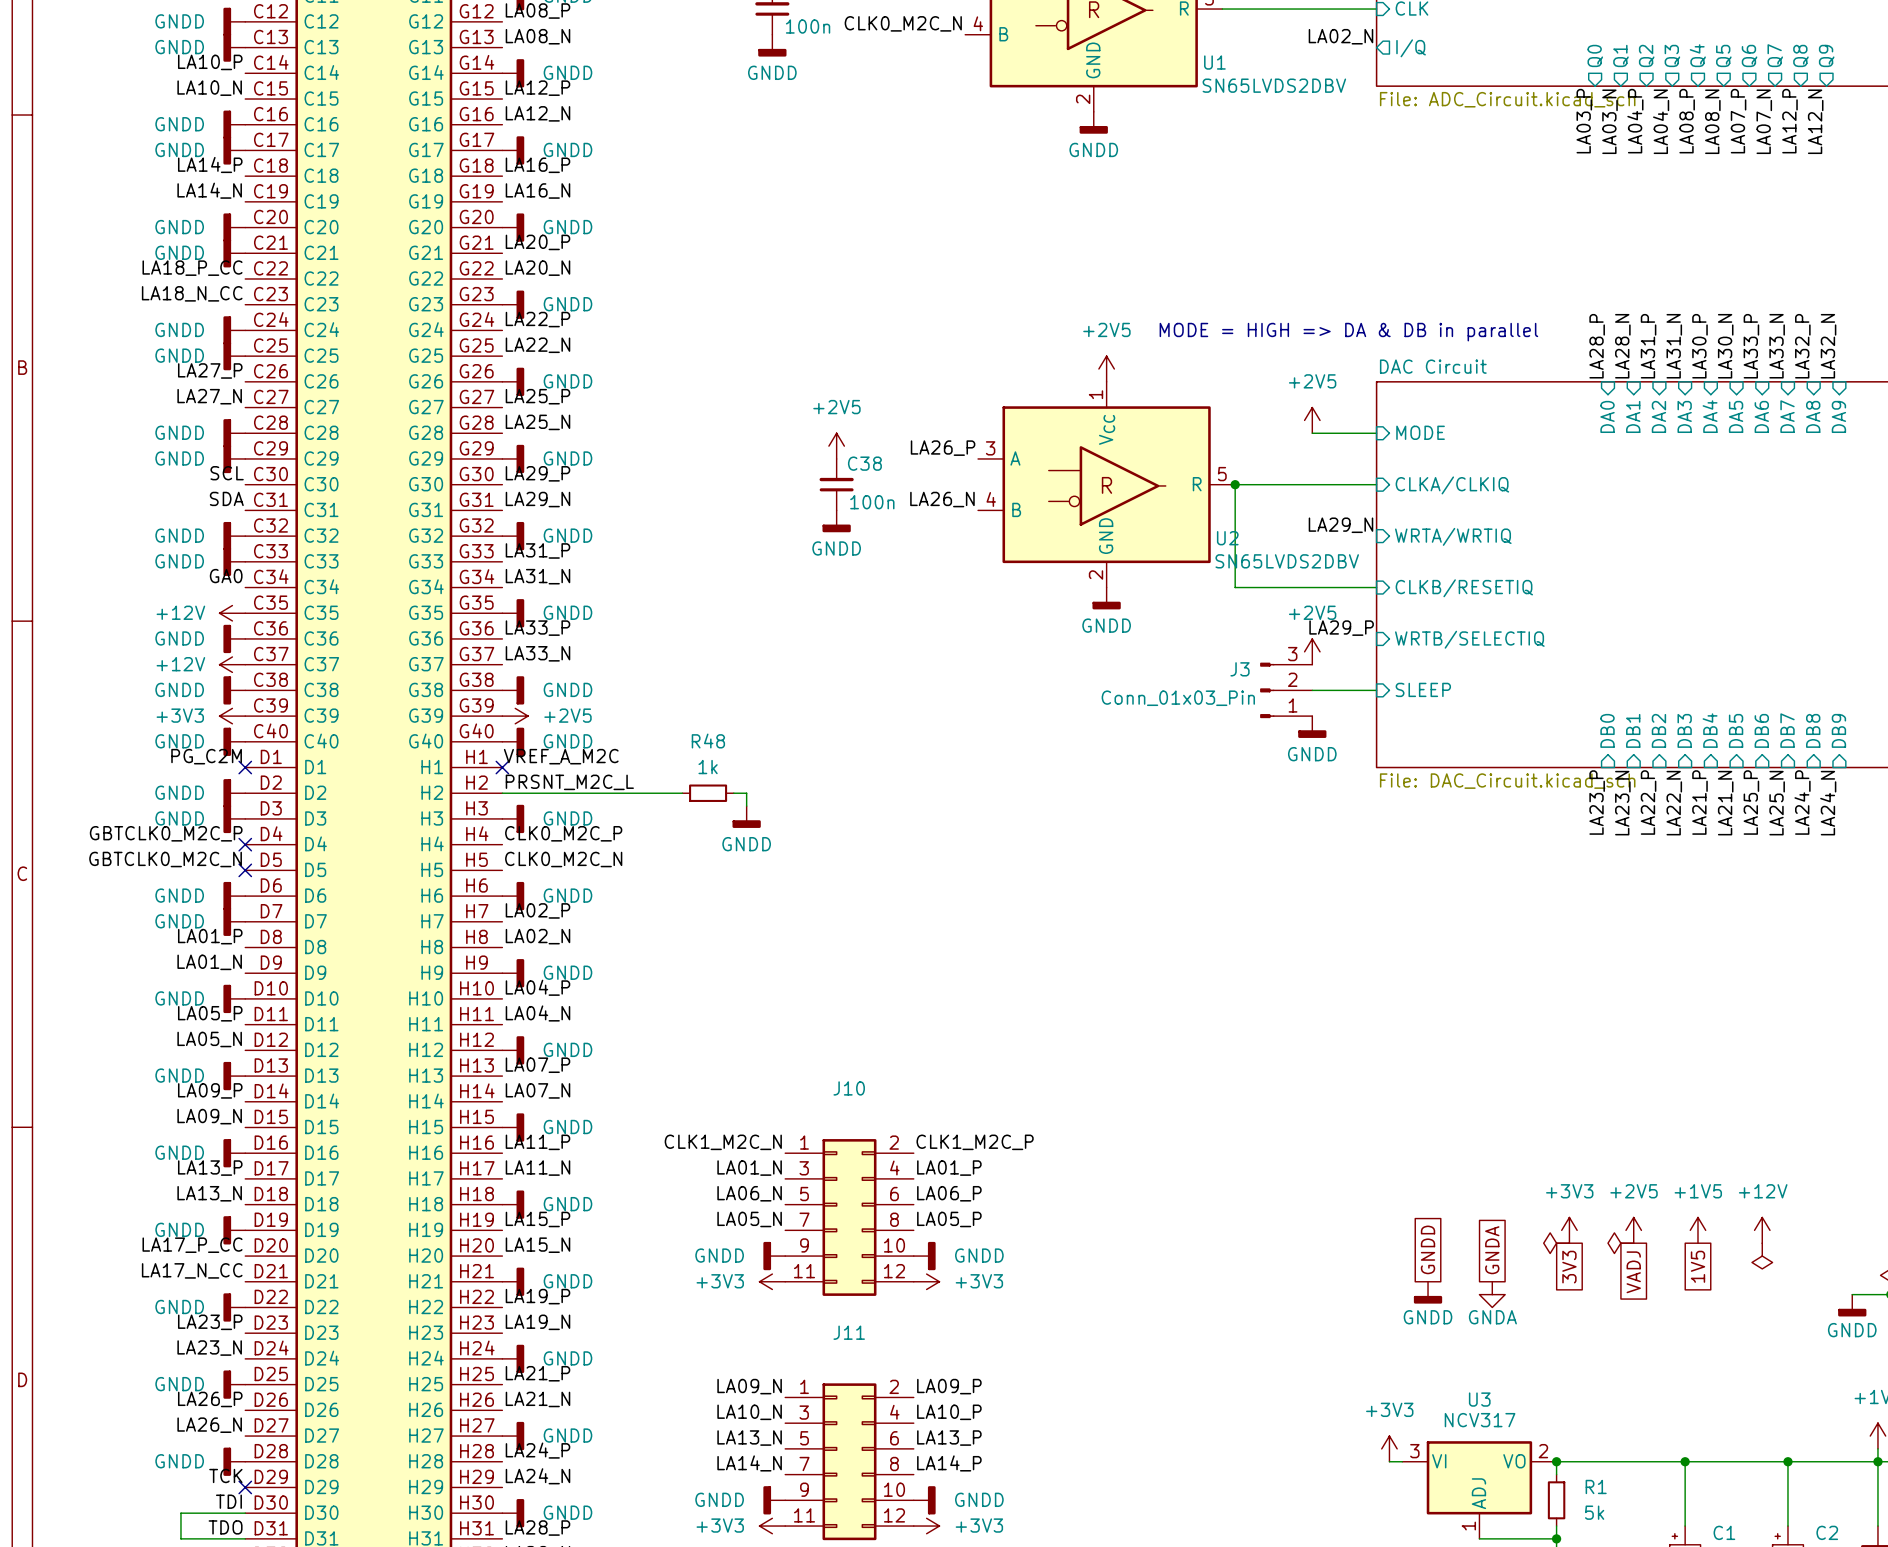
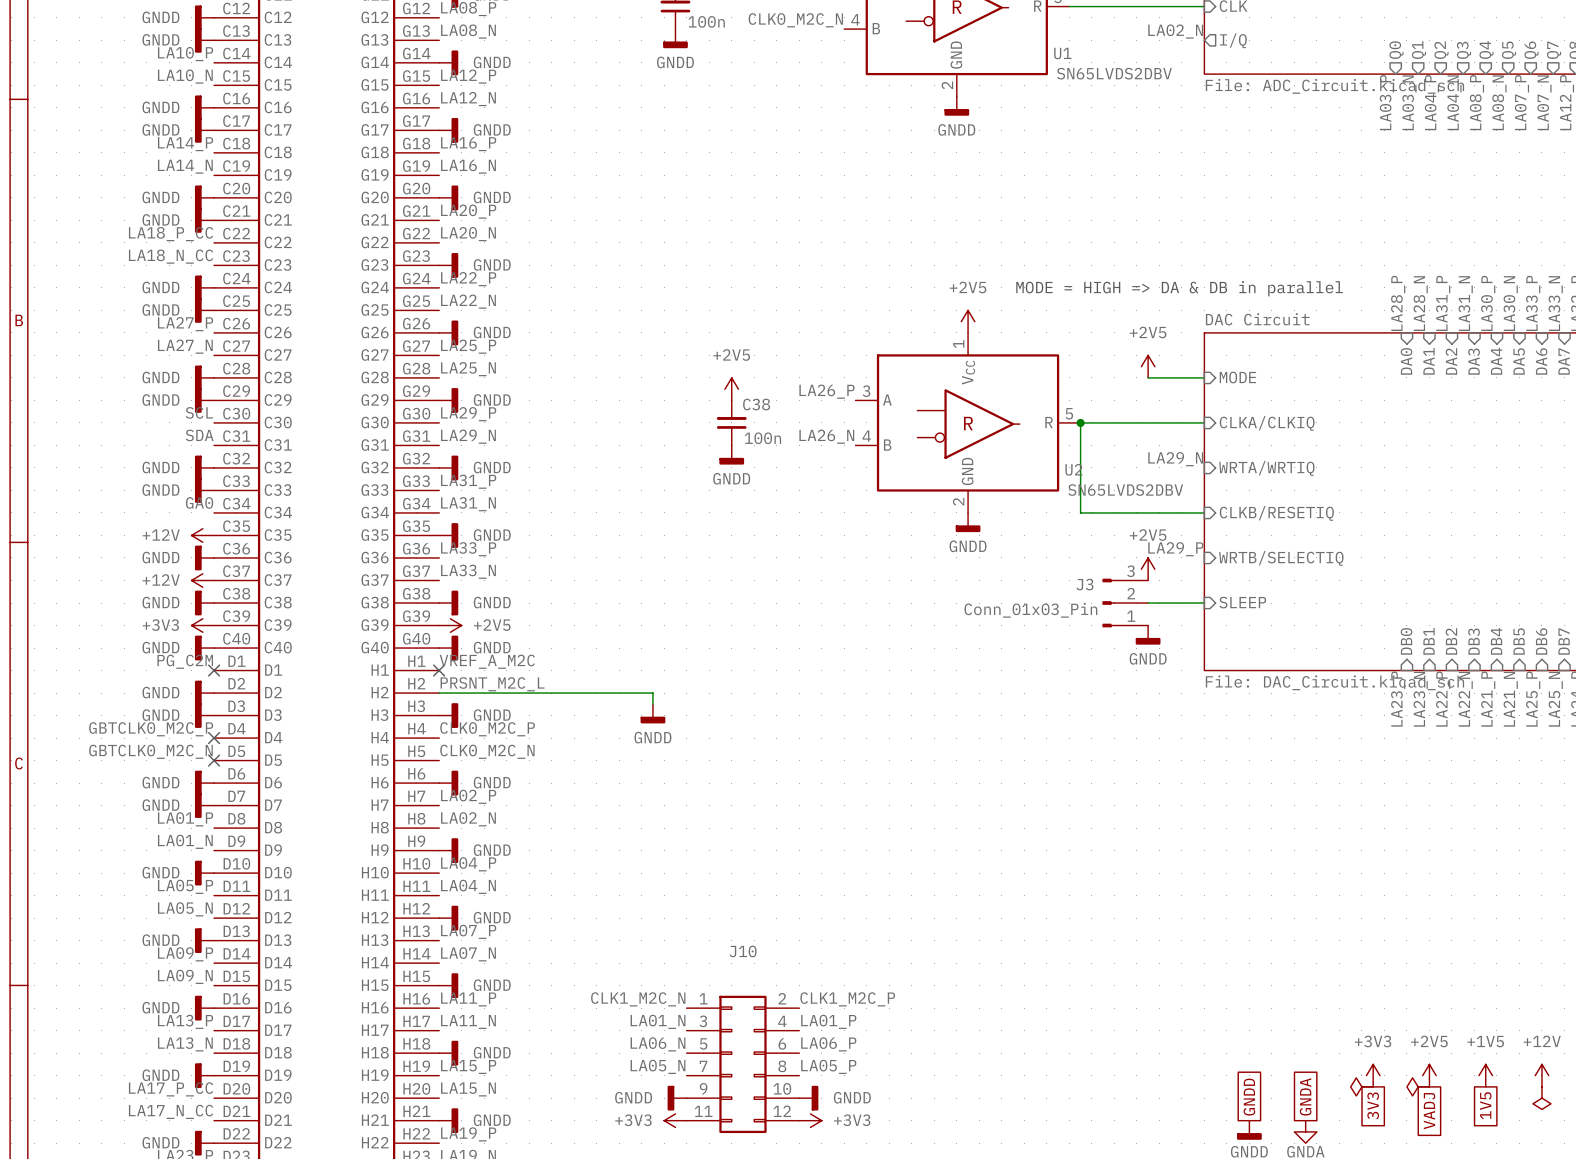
wire: none -> (596, 693) (641, 693)
R48: 1k (708, 793) -> none

